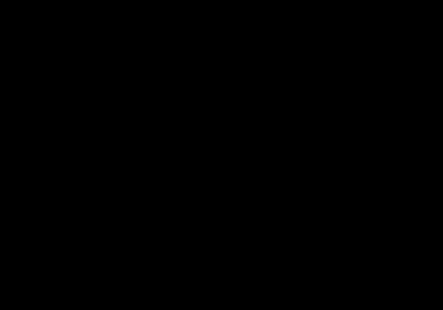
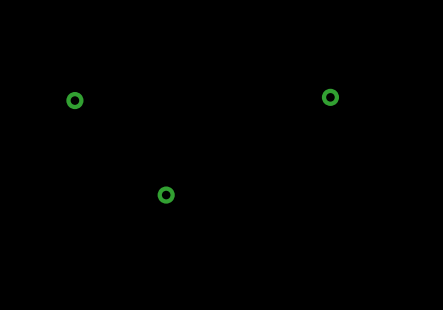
via: none -> (330, 97)
via: none -> (74, 100)
via: none -> (166, 195)

